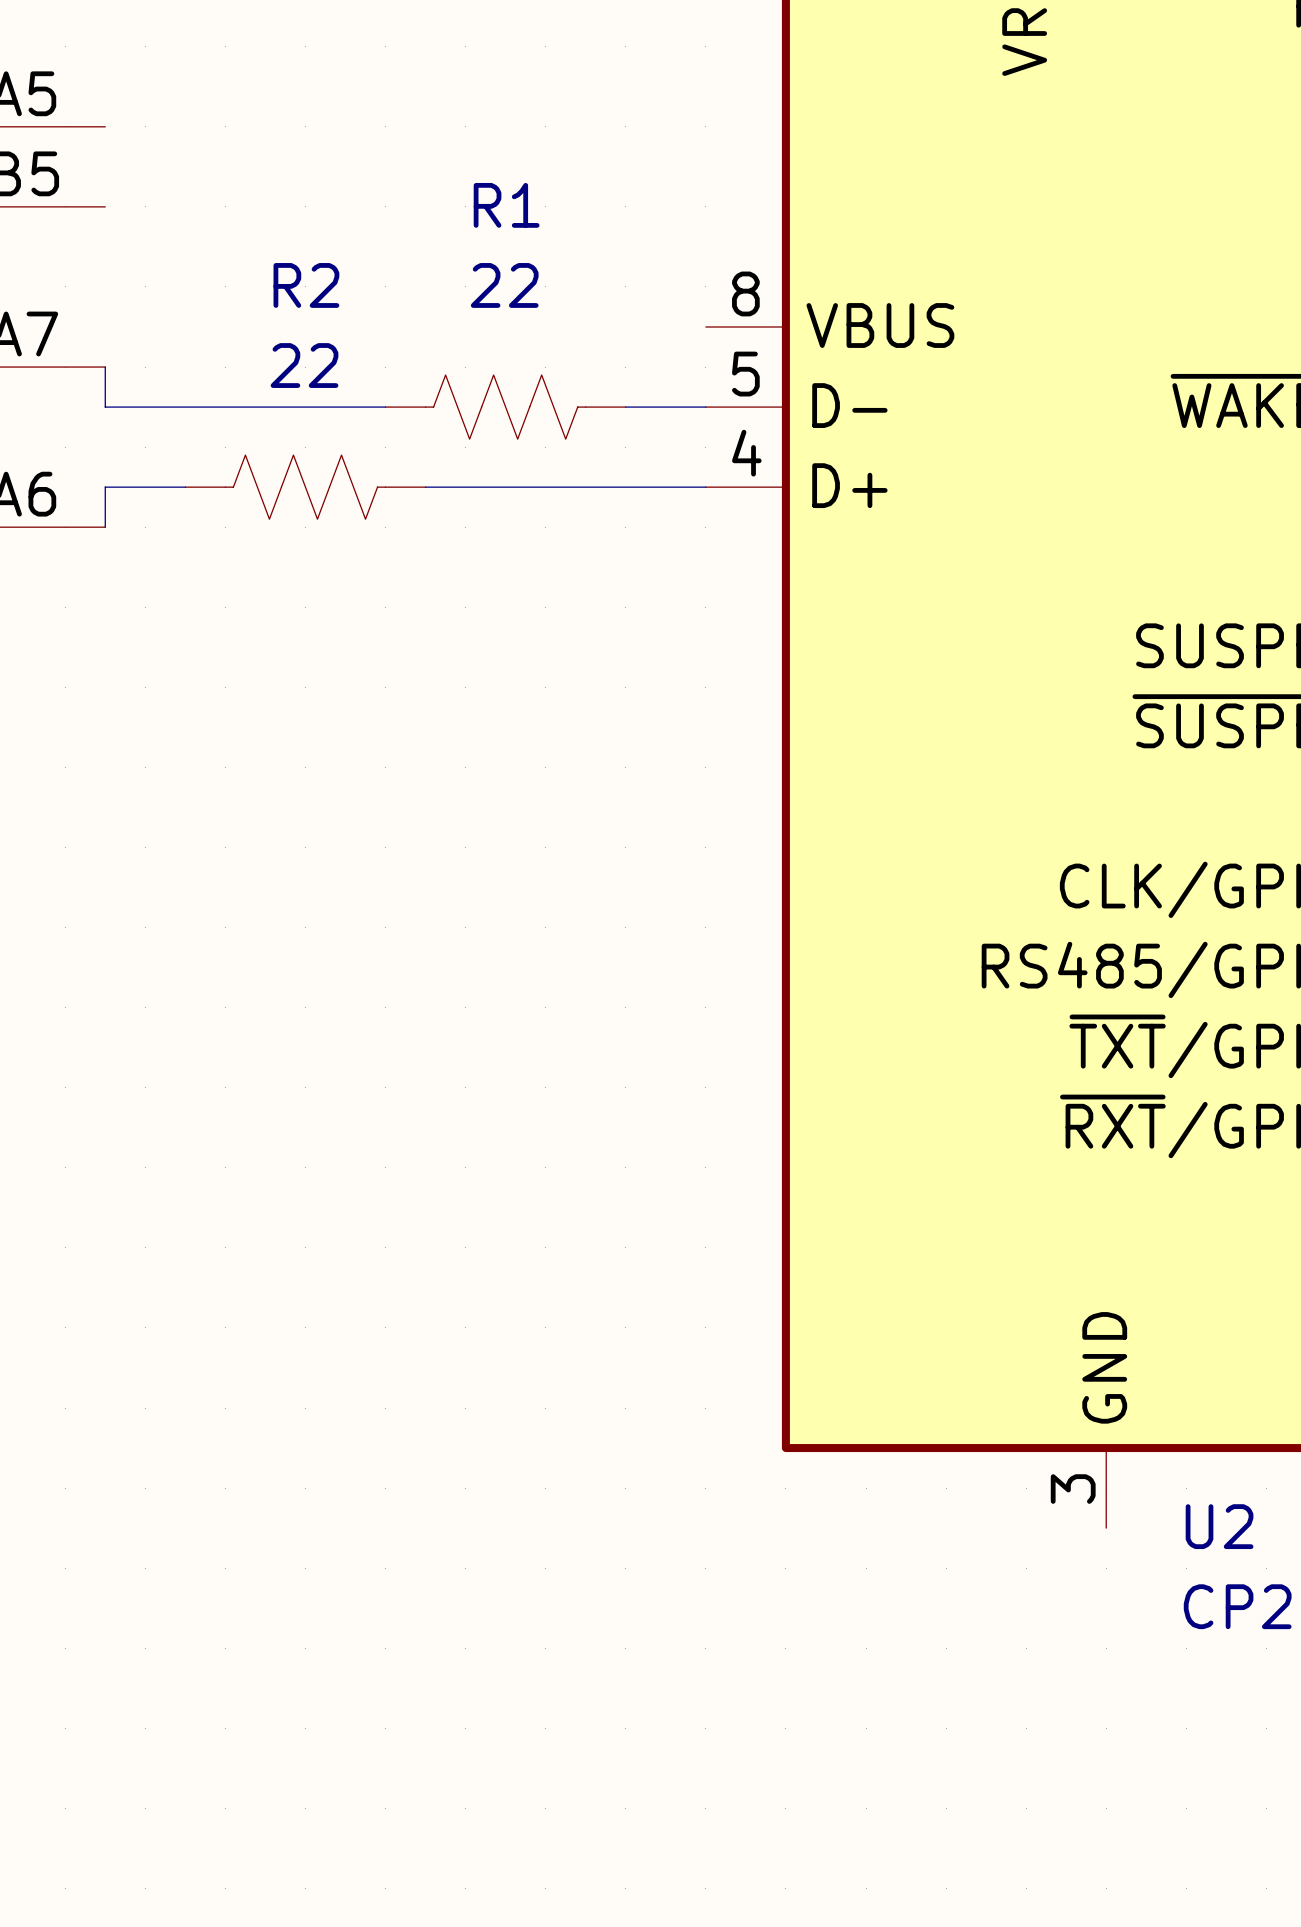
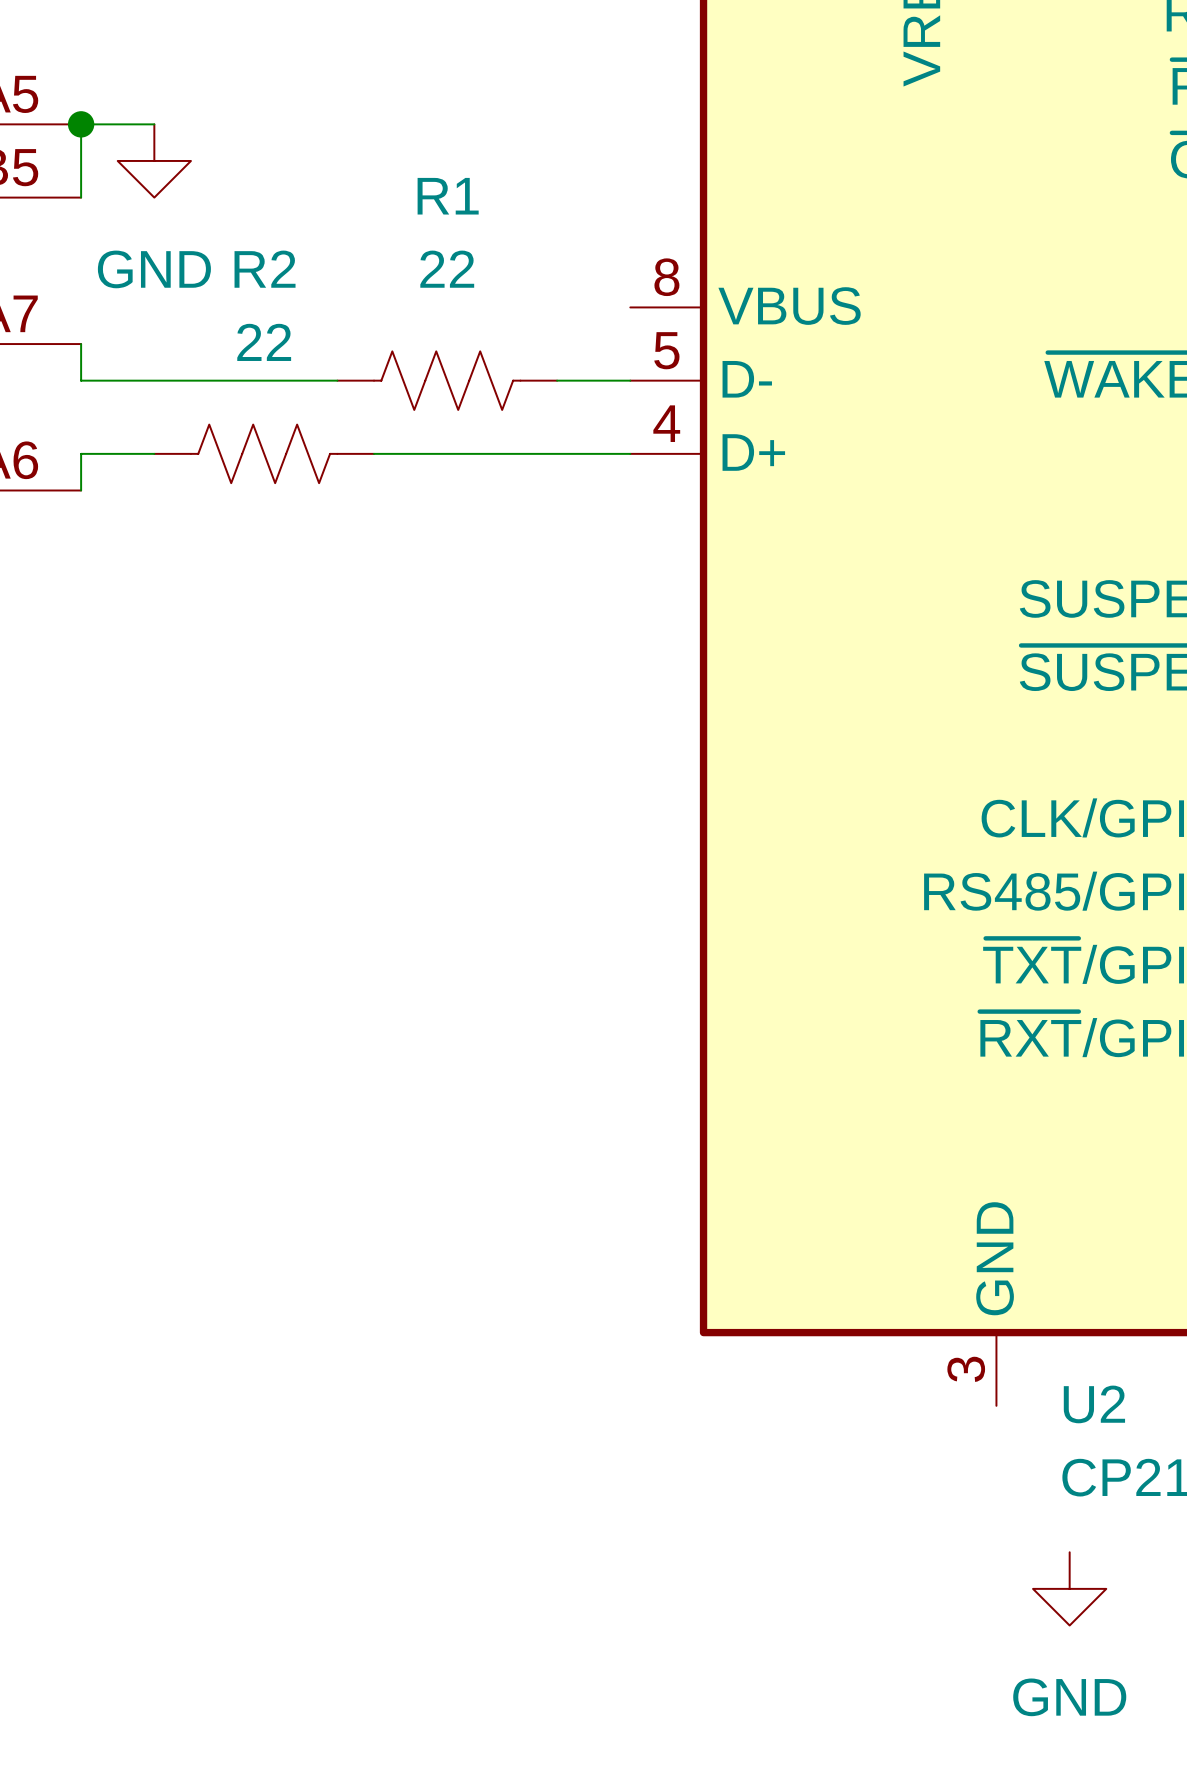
junction: none -> (81, 124)
wire: none -> (154, 124) (81, 124) (81, 197)
power symbol: none -> GND (154, 160)
power symbol: none -> GND (1069, 1588)

